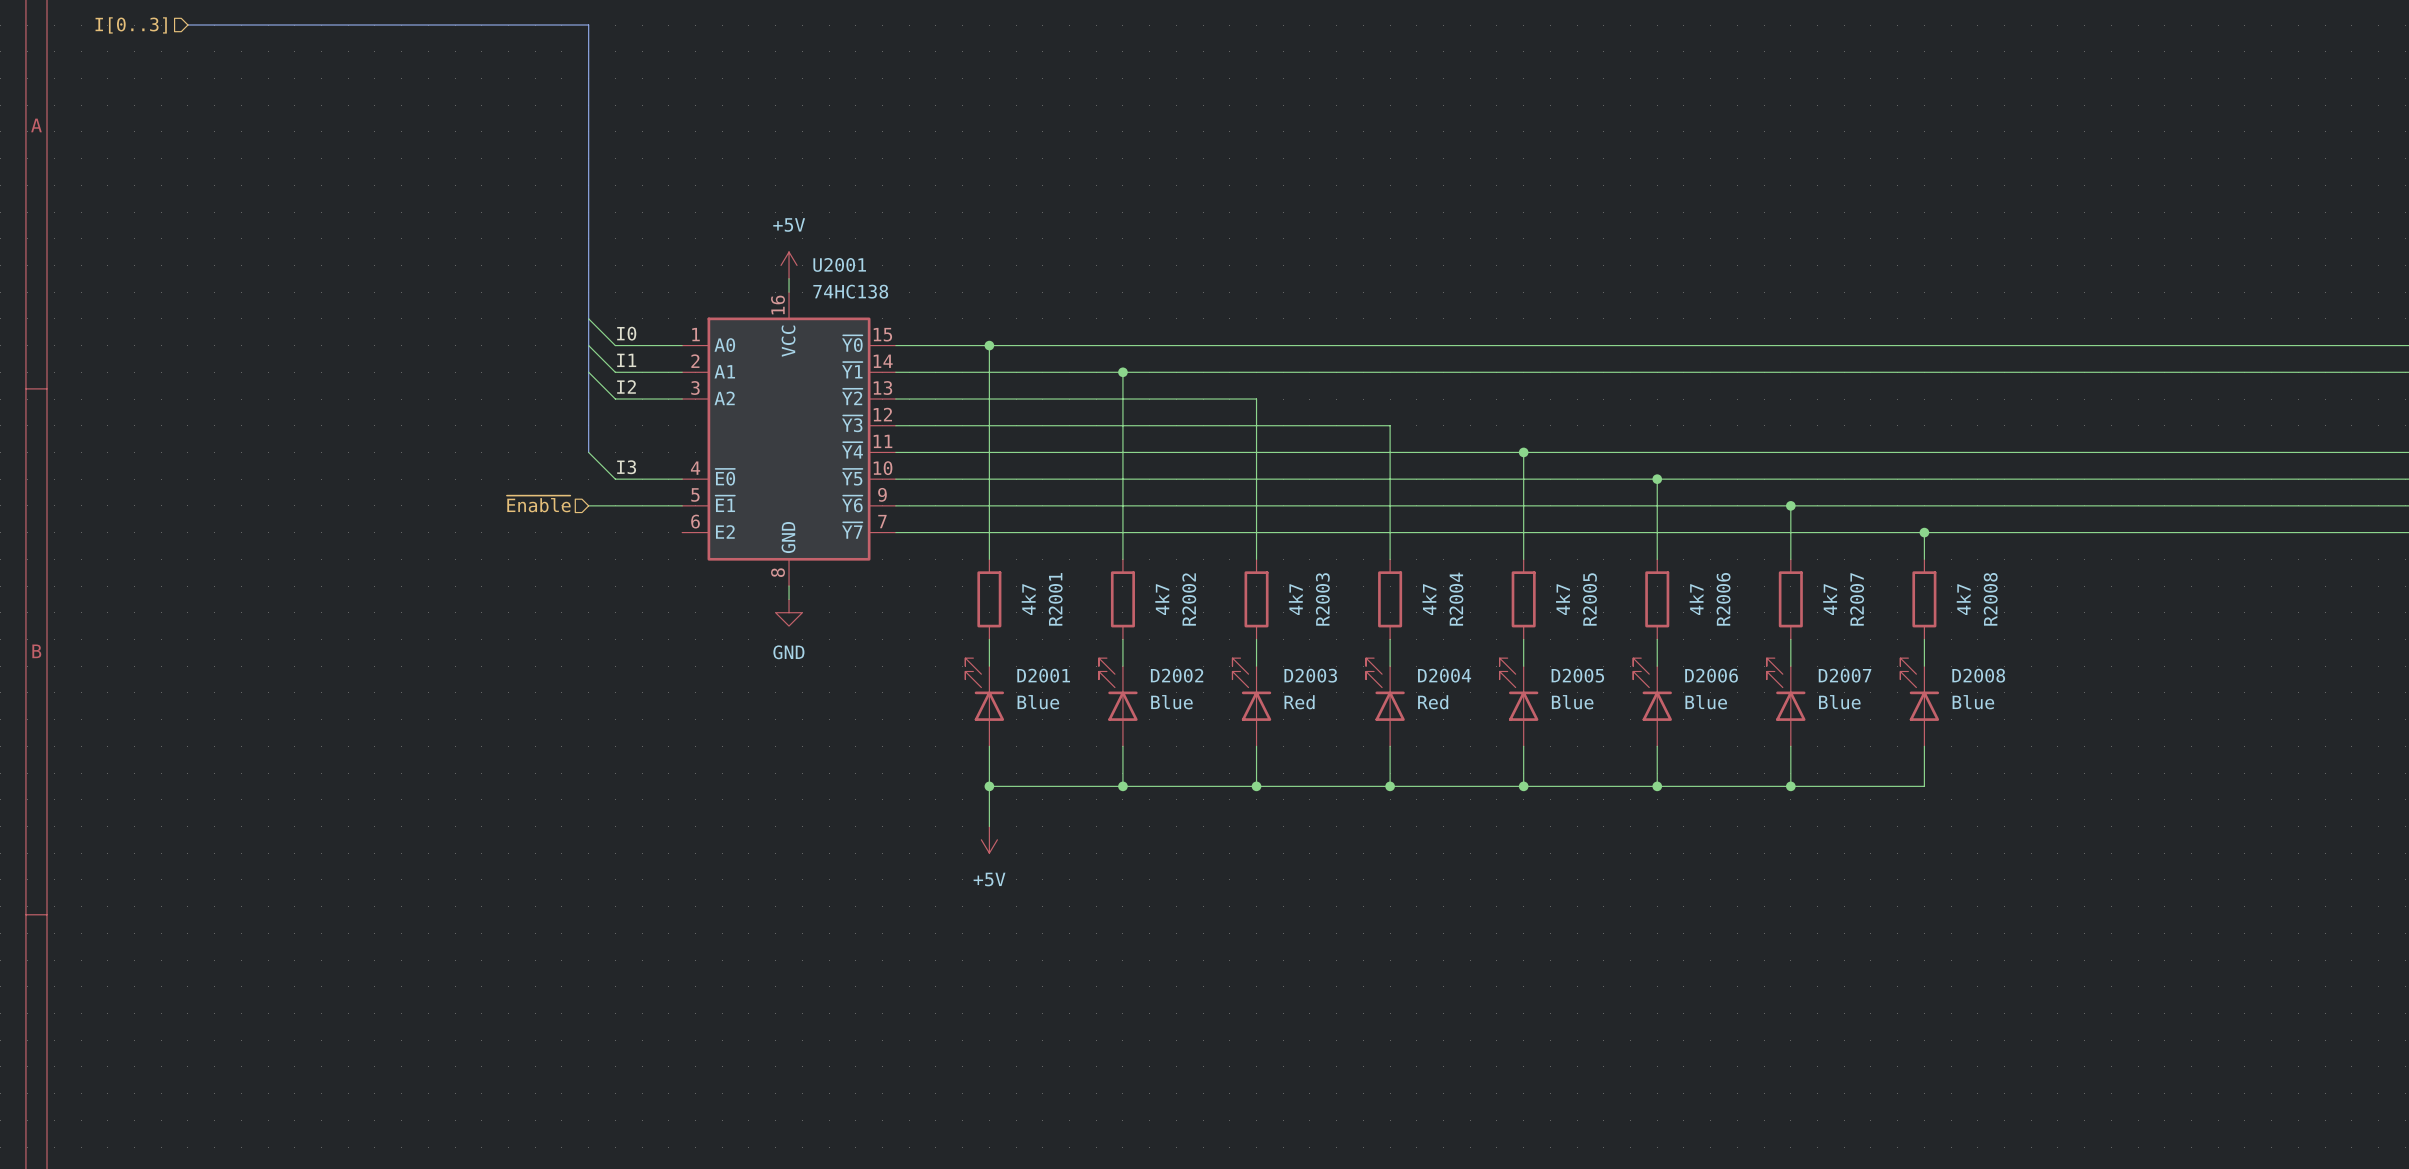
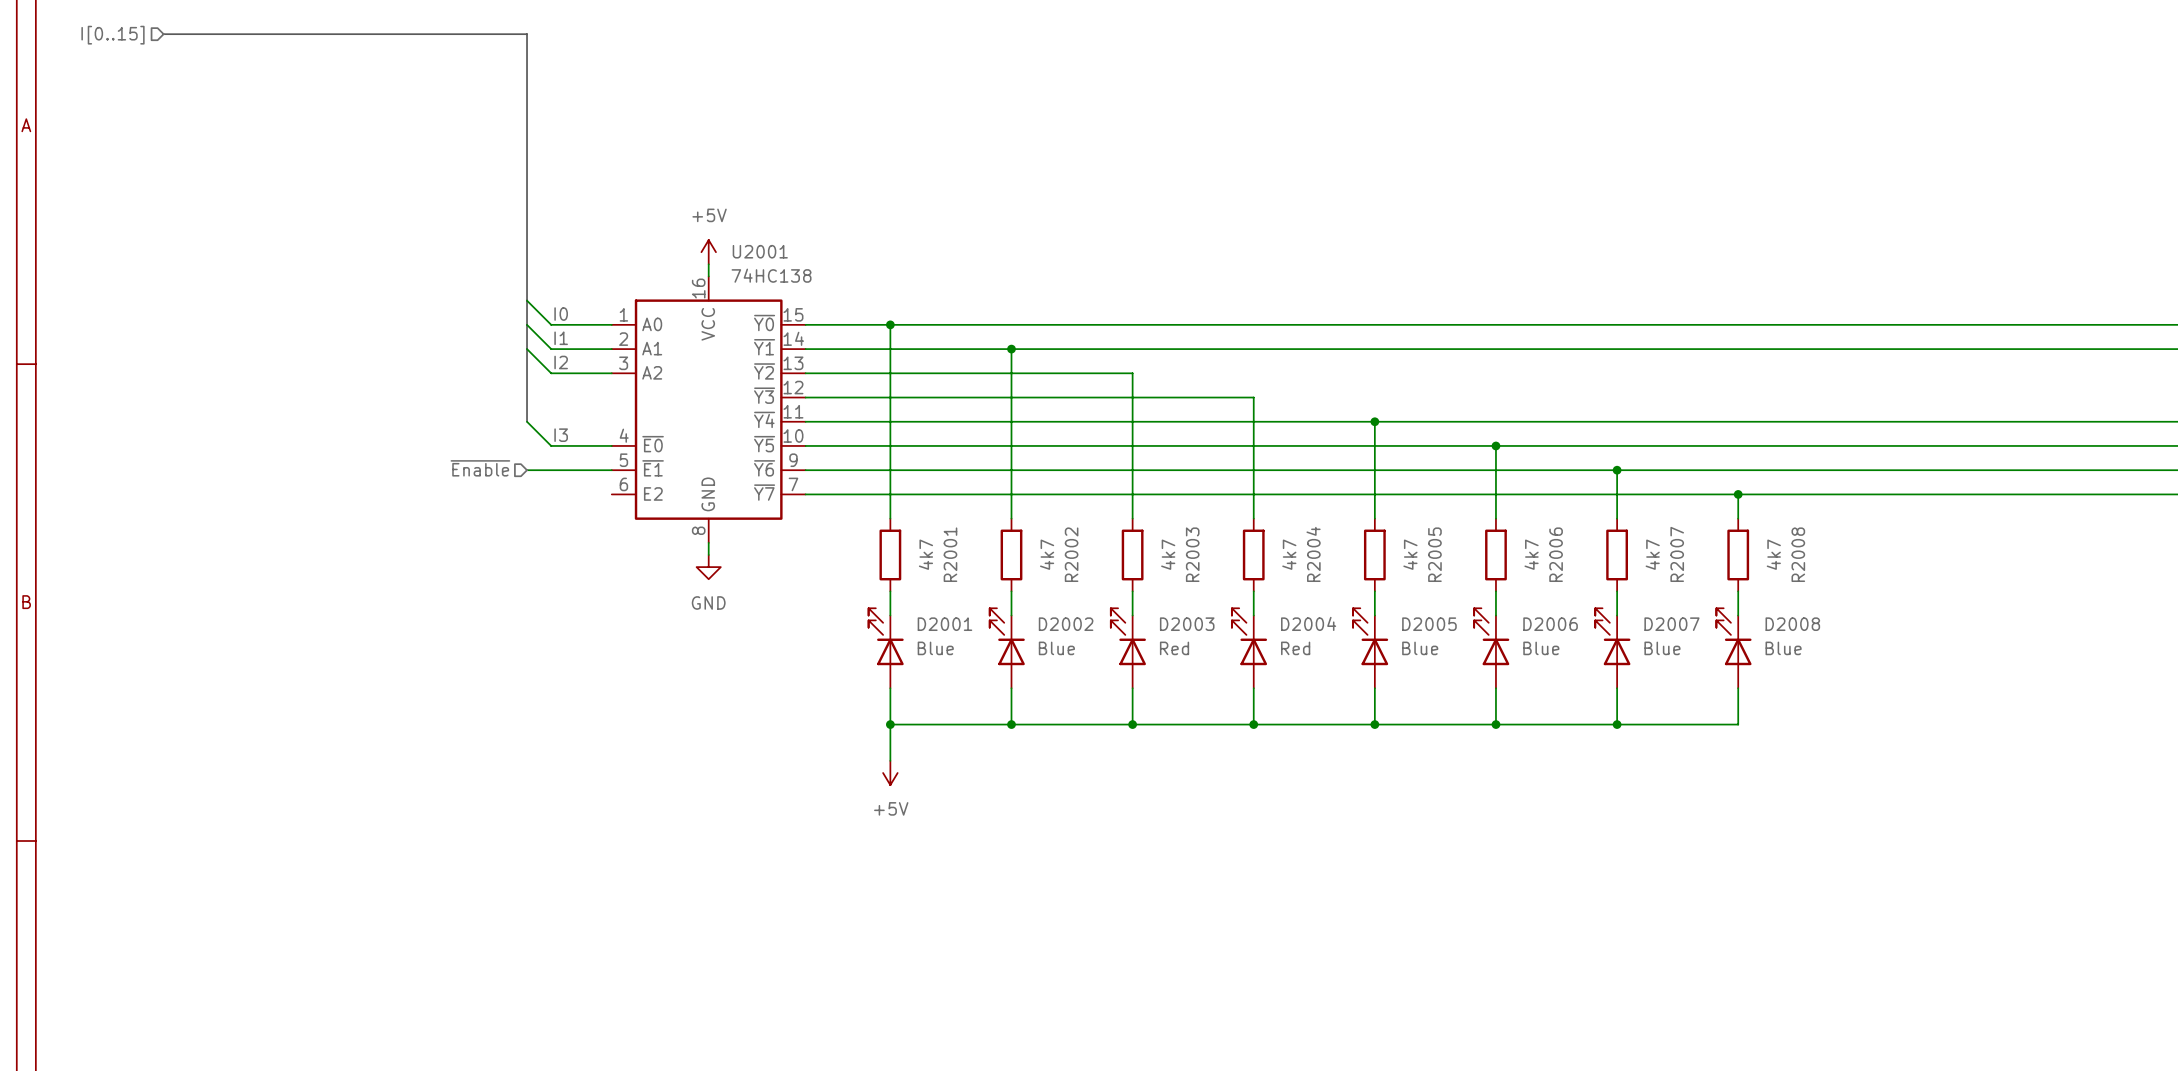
hierarchical label: I[0..3] (131, 25) -> I[0..15] (113, 35)

